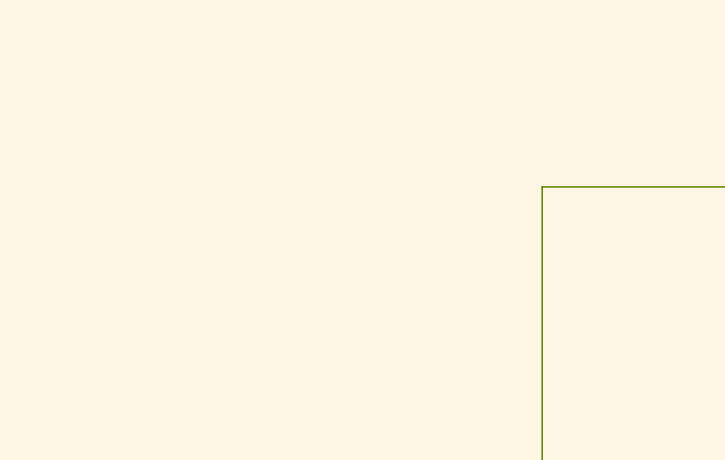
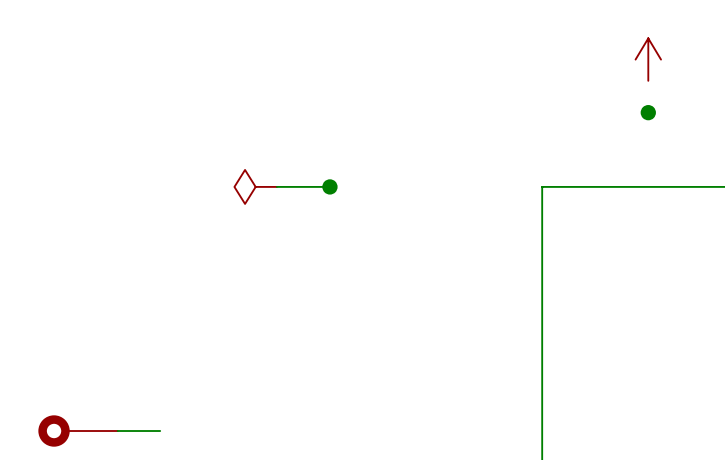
power symbol: none -> (648, 59)
junction: none -> (648, 112)
power symbol: none -> (255, 186)
wire: none -> (276, 186) (329, 186)
junction: none -> (329, 186)
part: none -> (78, 431)
wire: none -> (117, 431) (160, 431)

